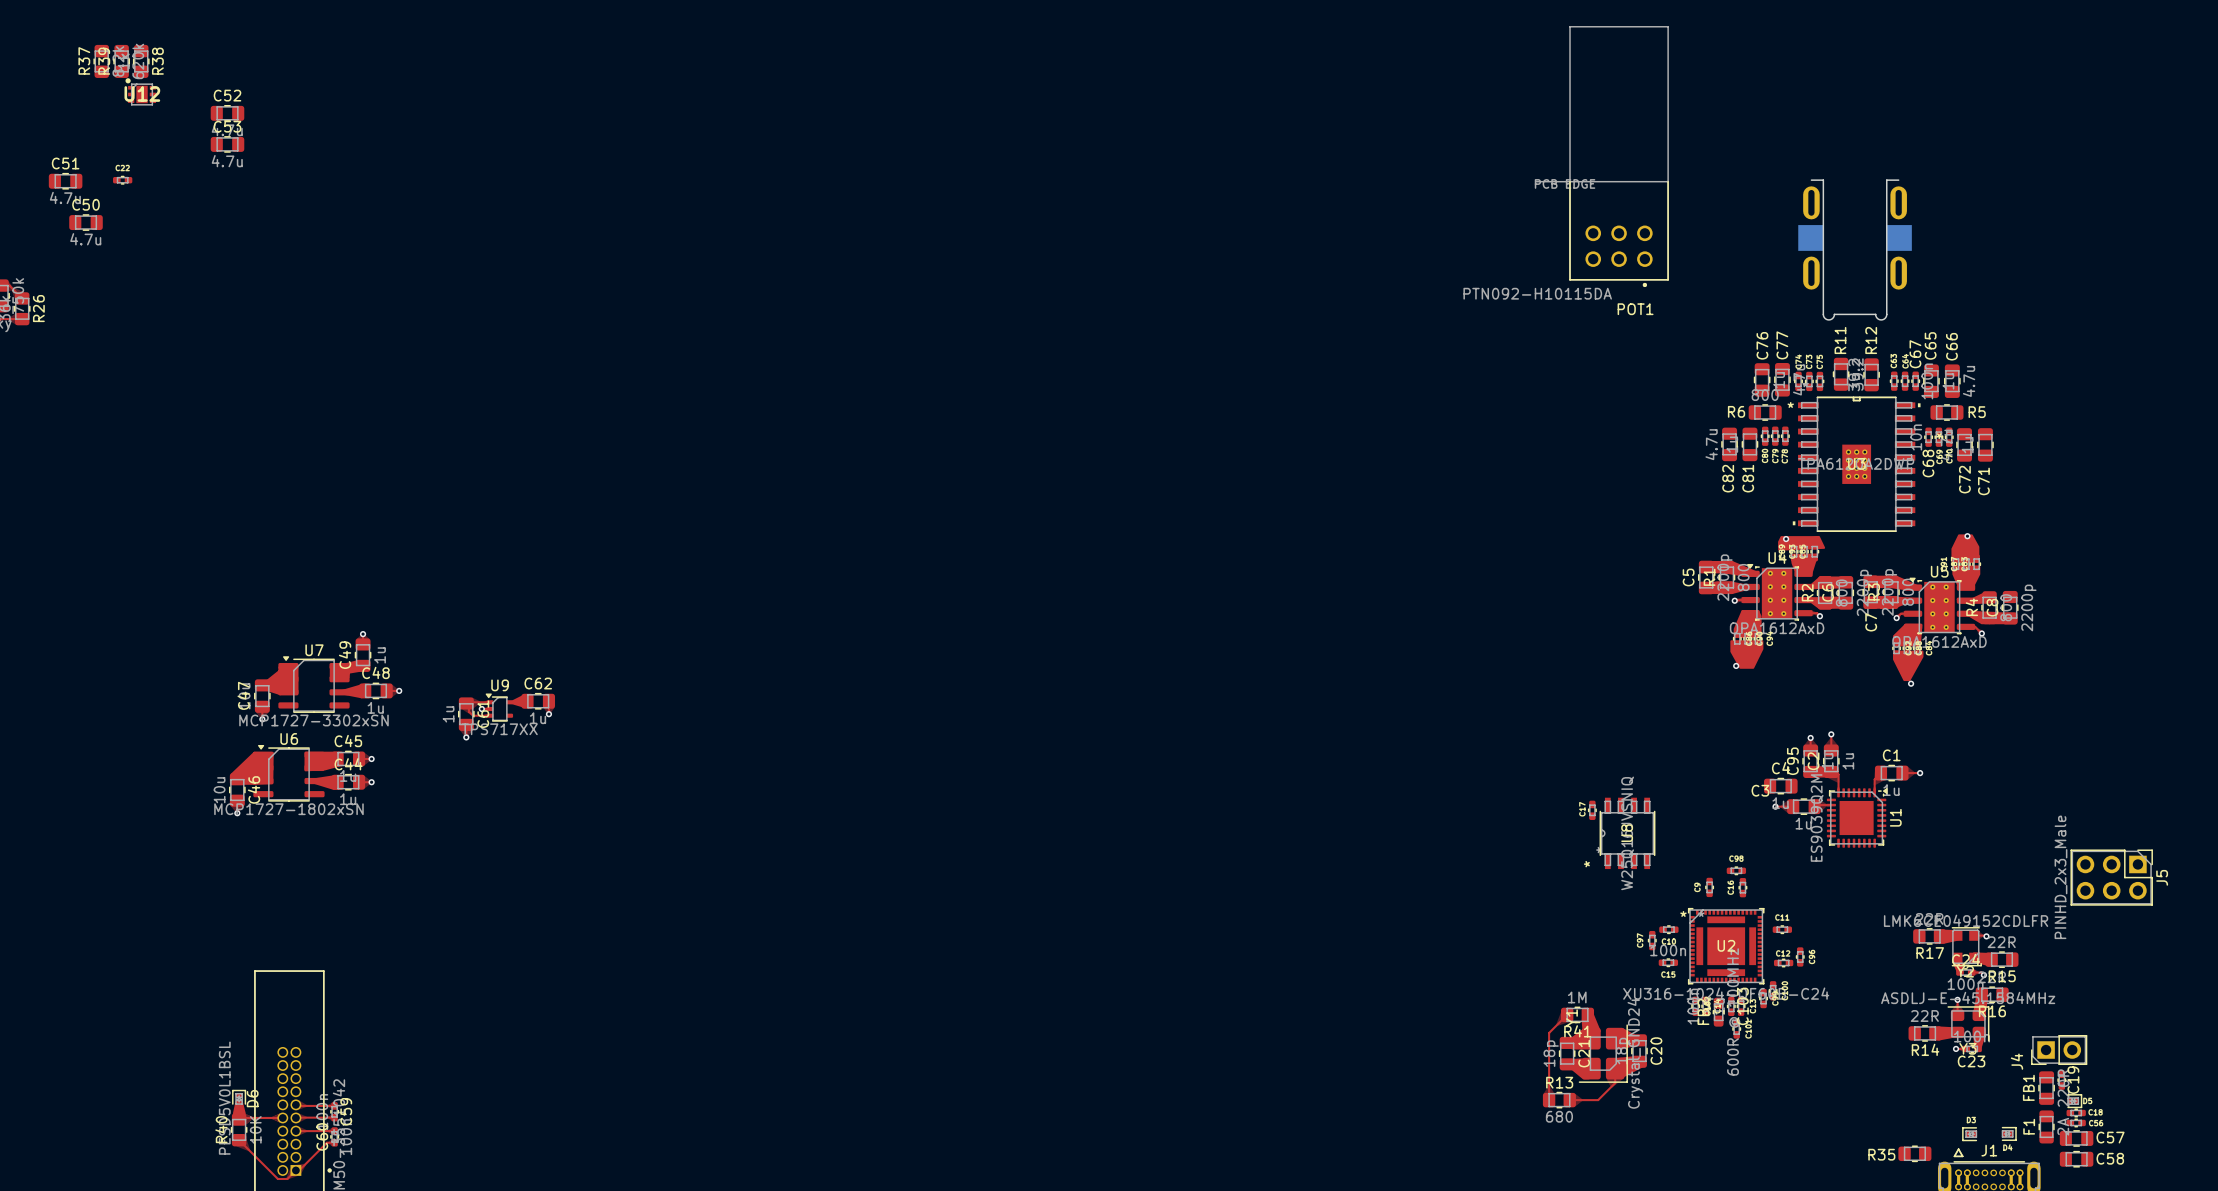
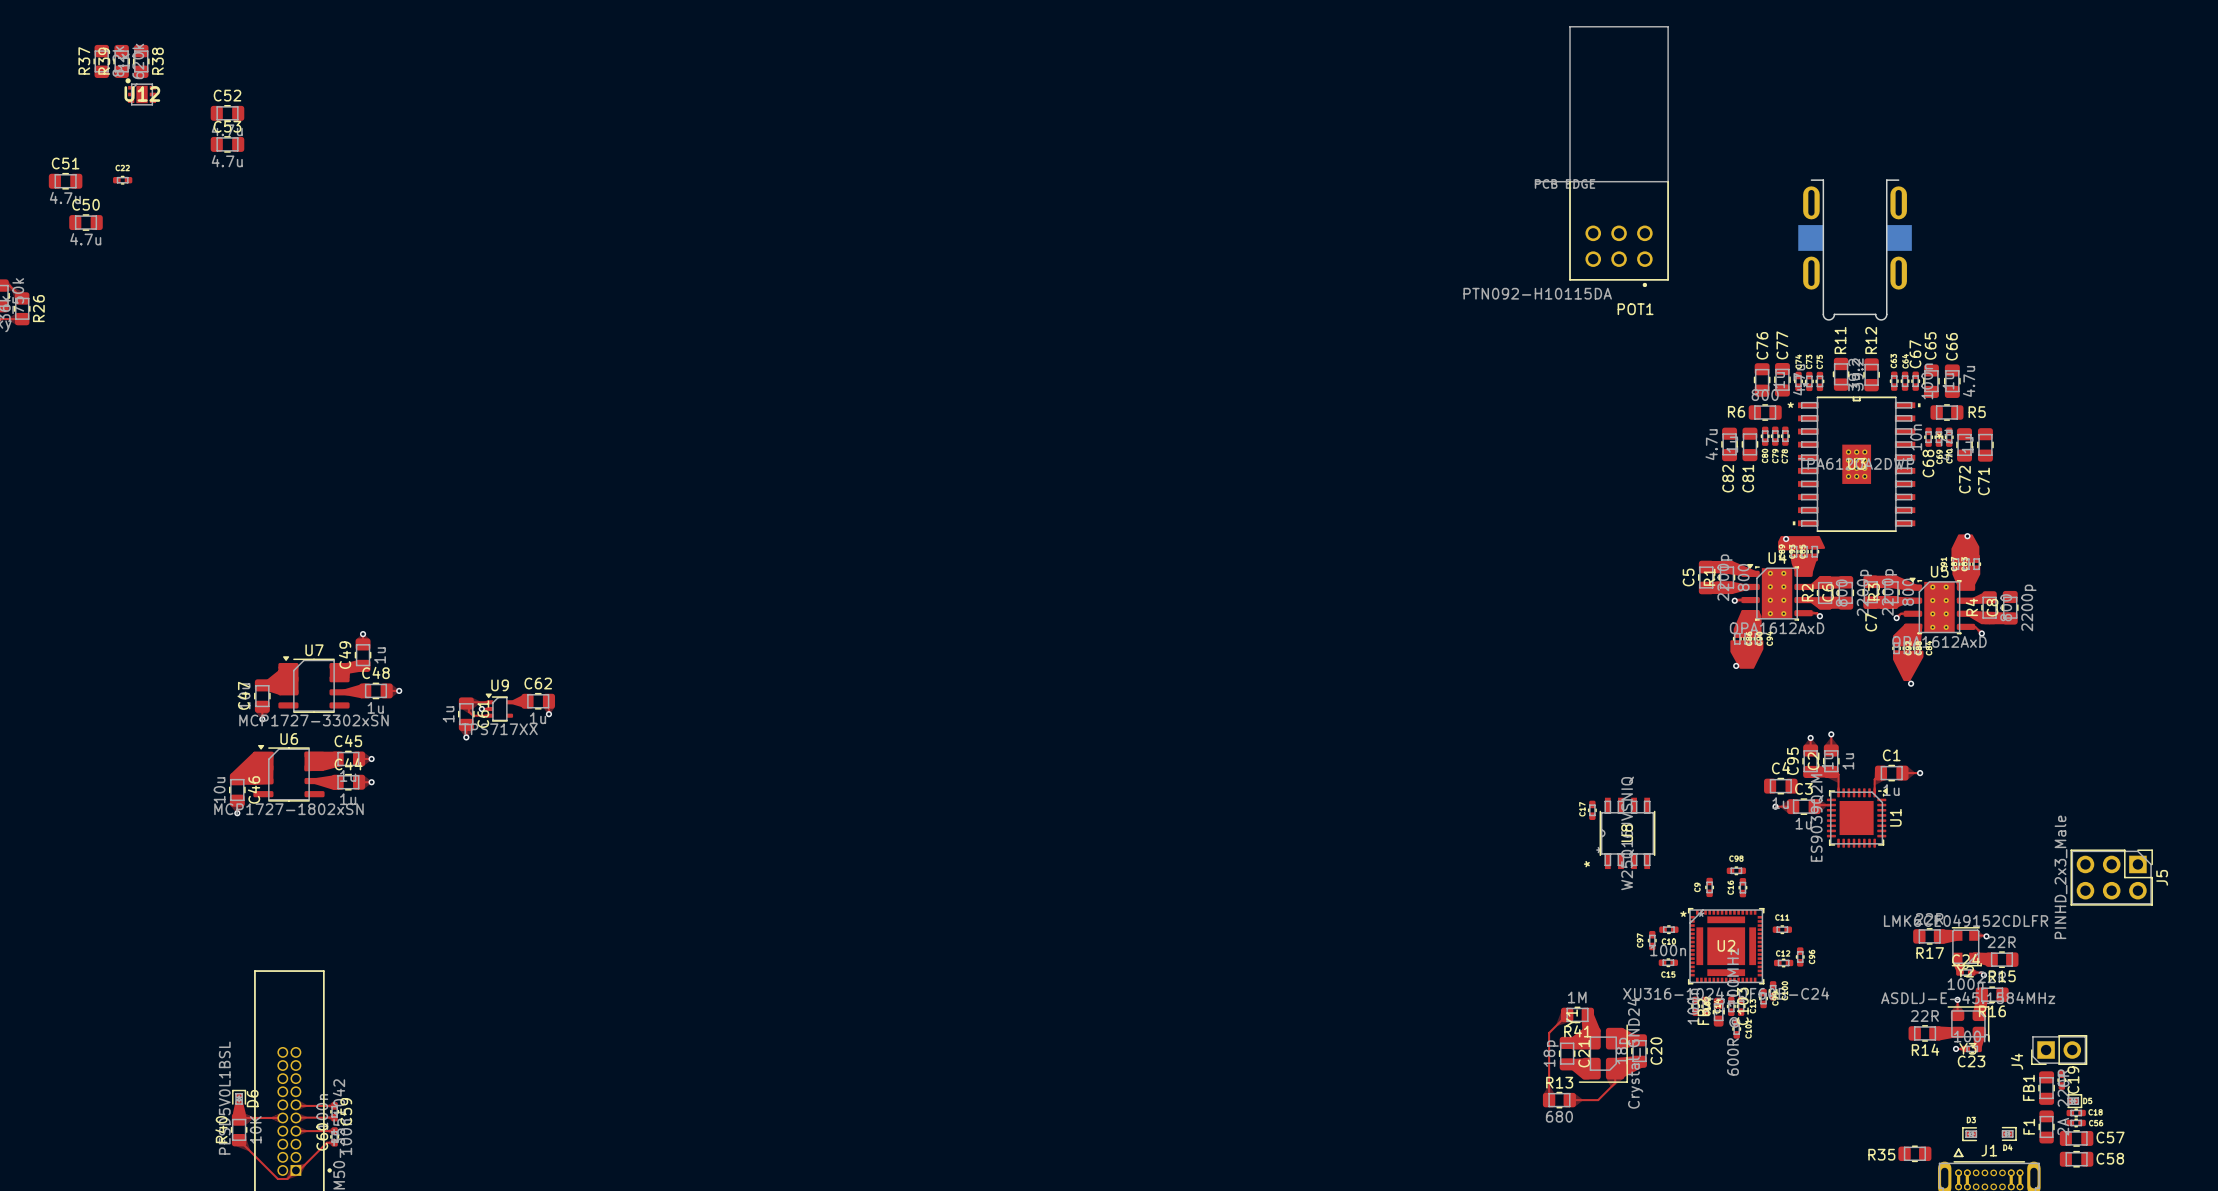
C3 name position: C3 (1760, 790) -> C3 (1803, 788)

